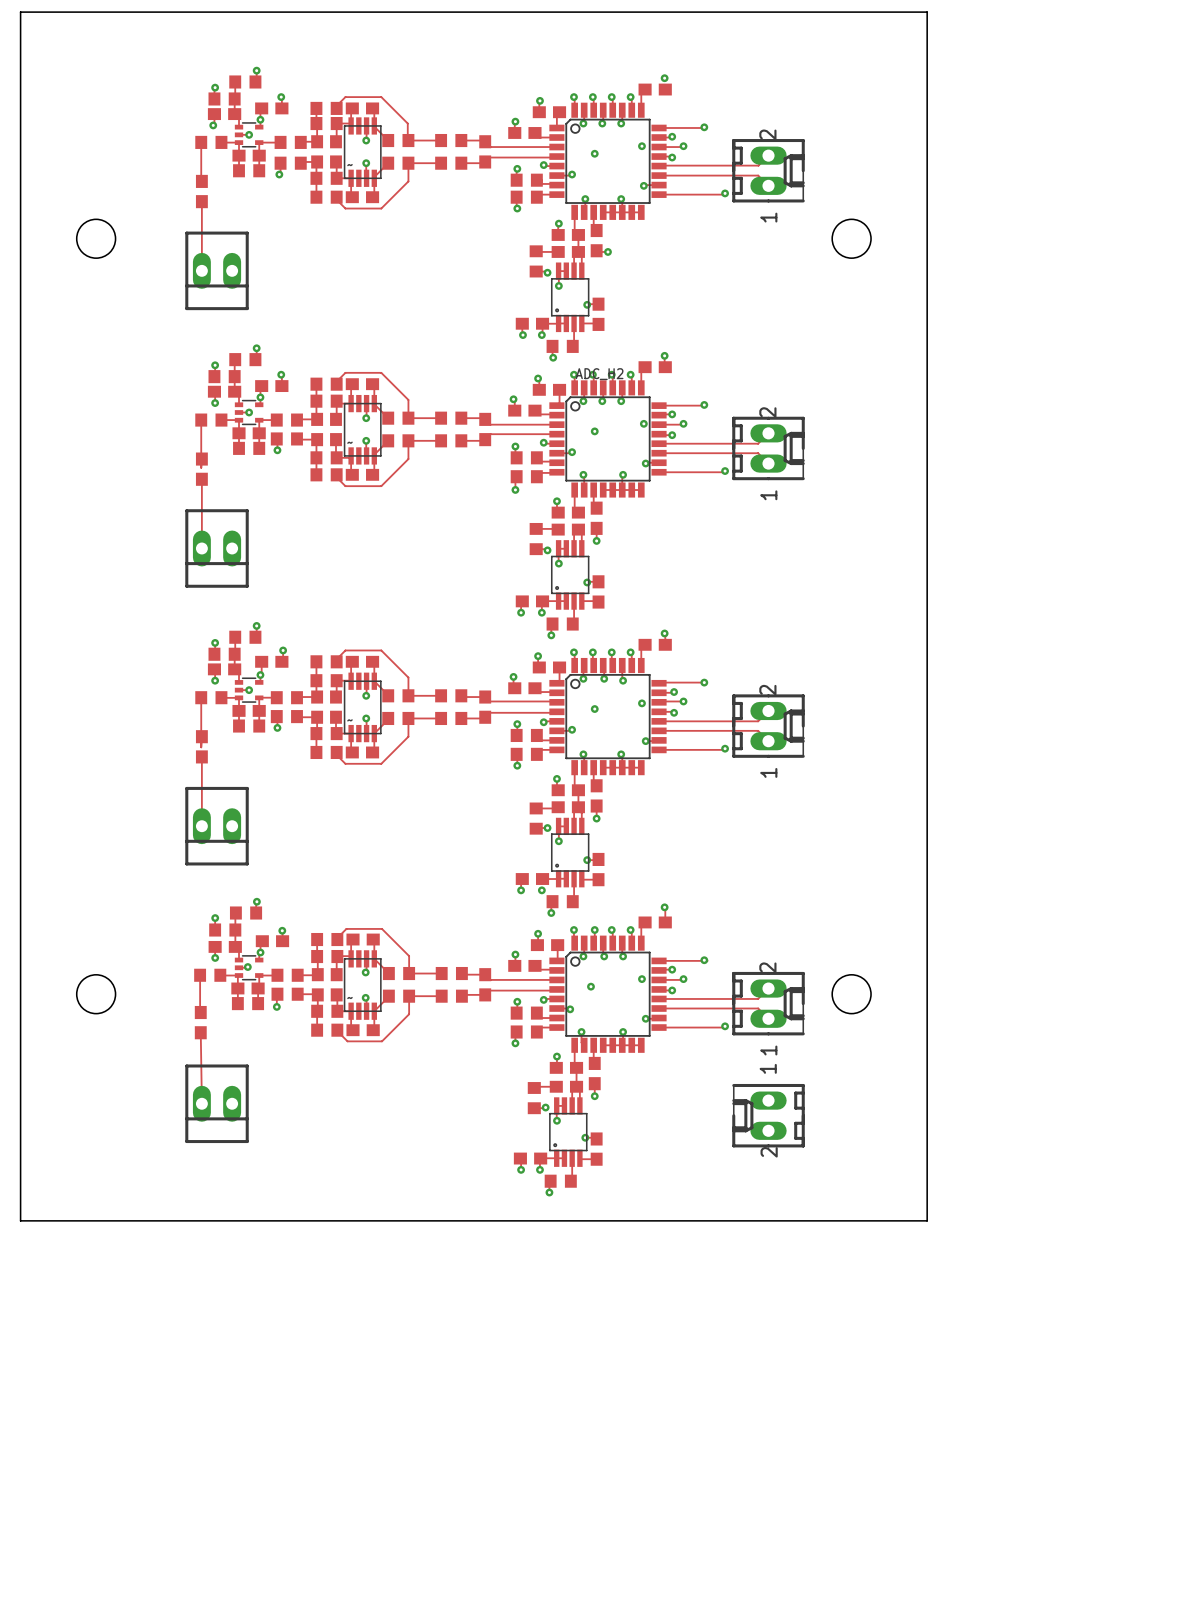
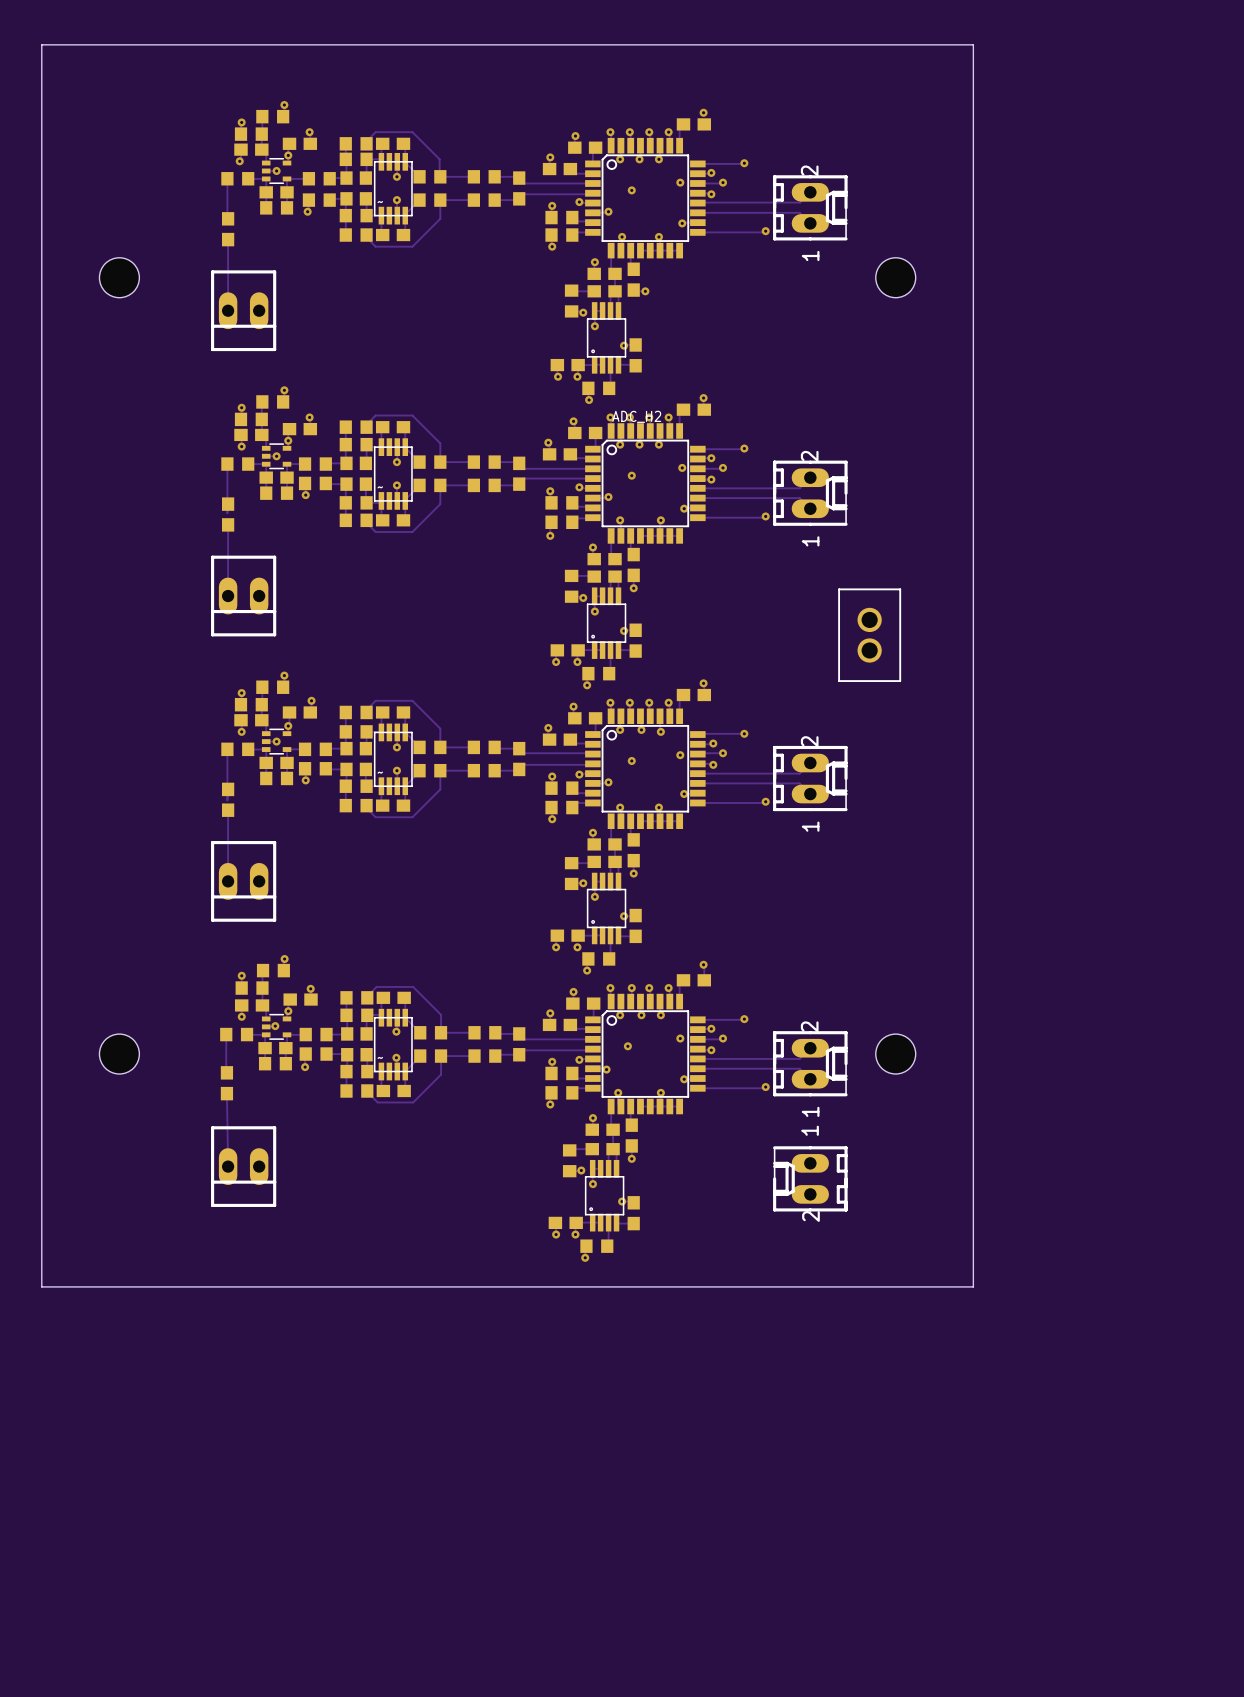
part: none -> (869, 635)

